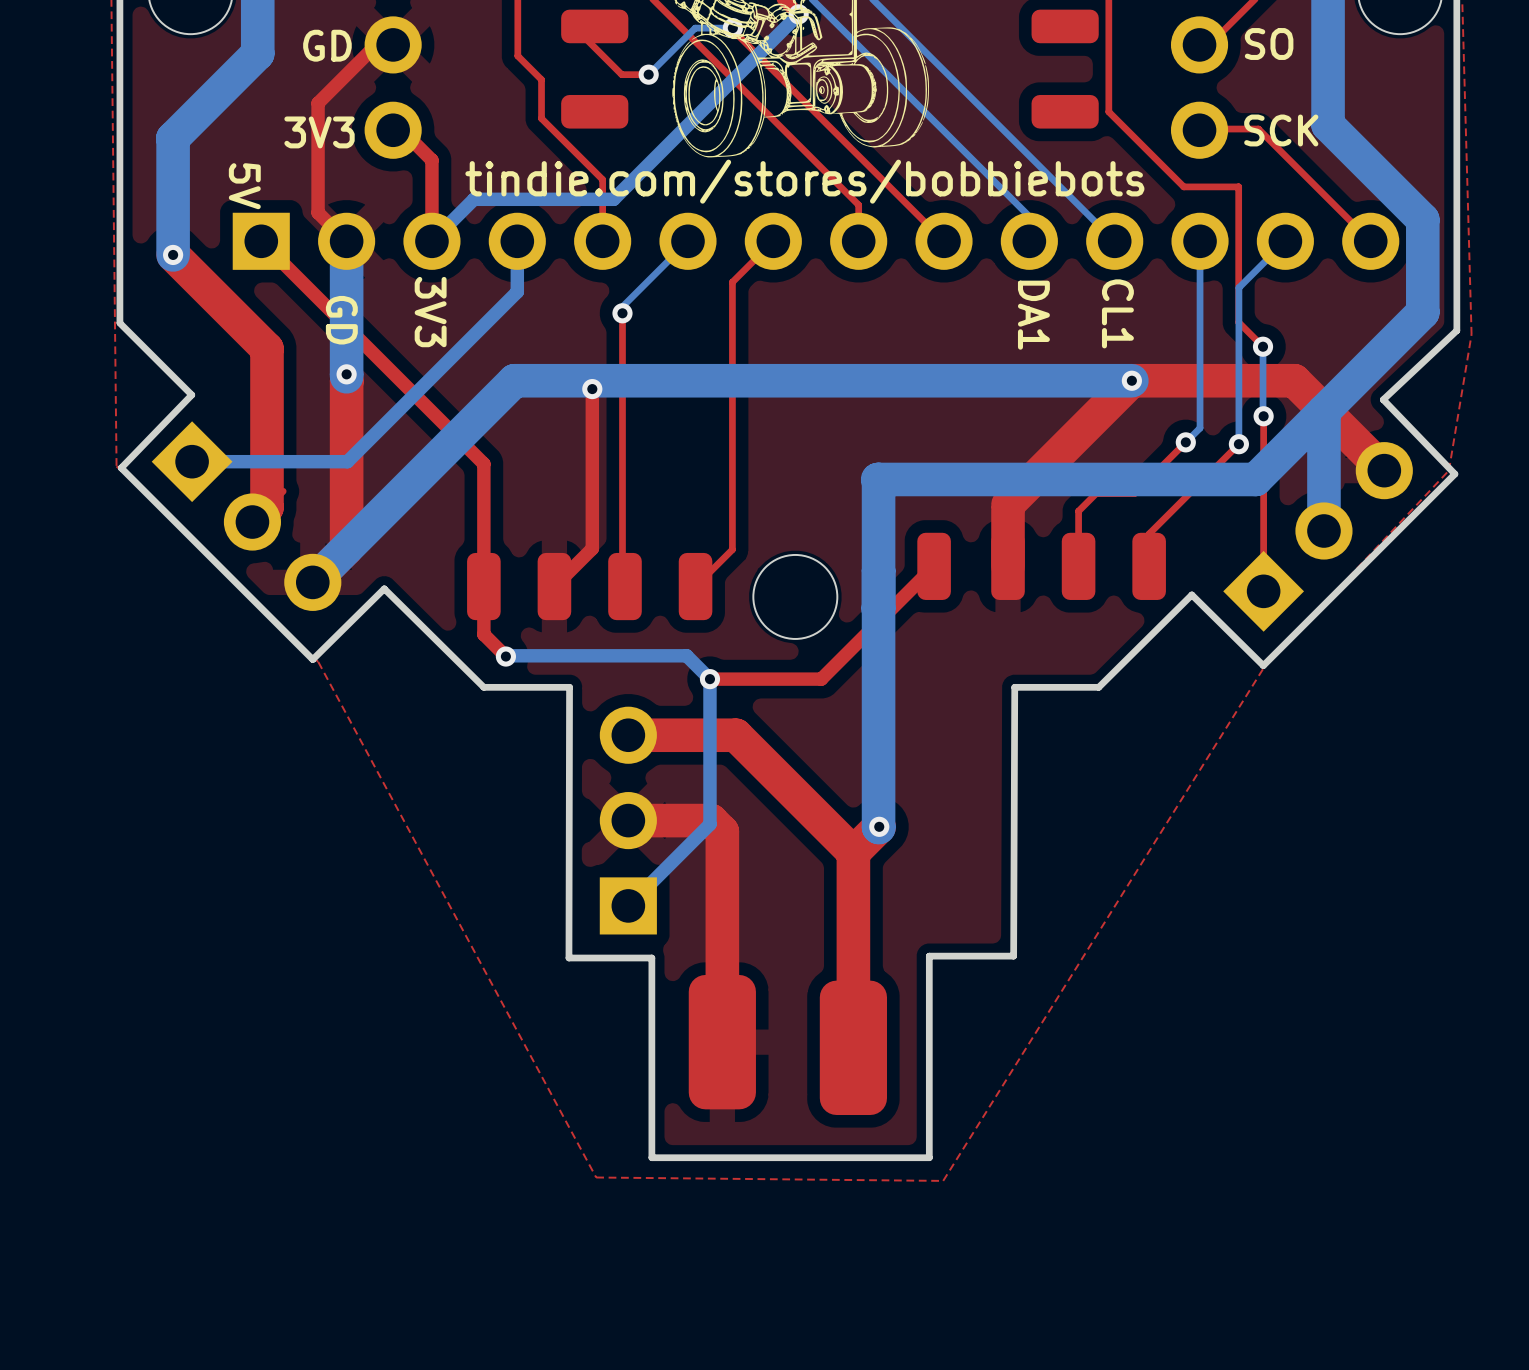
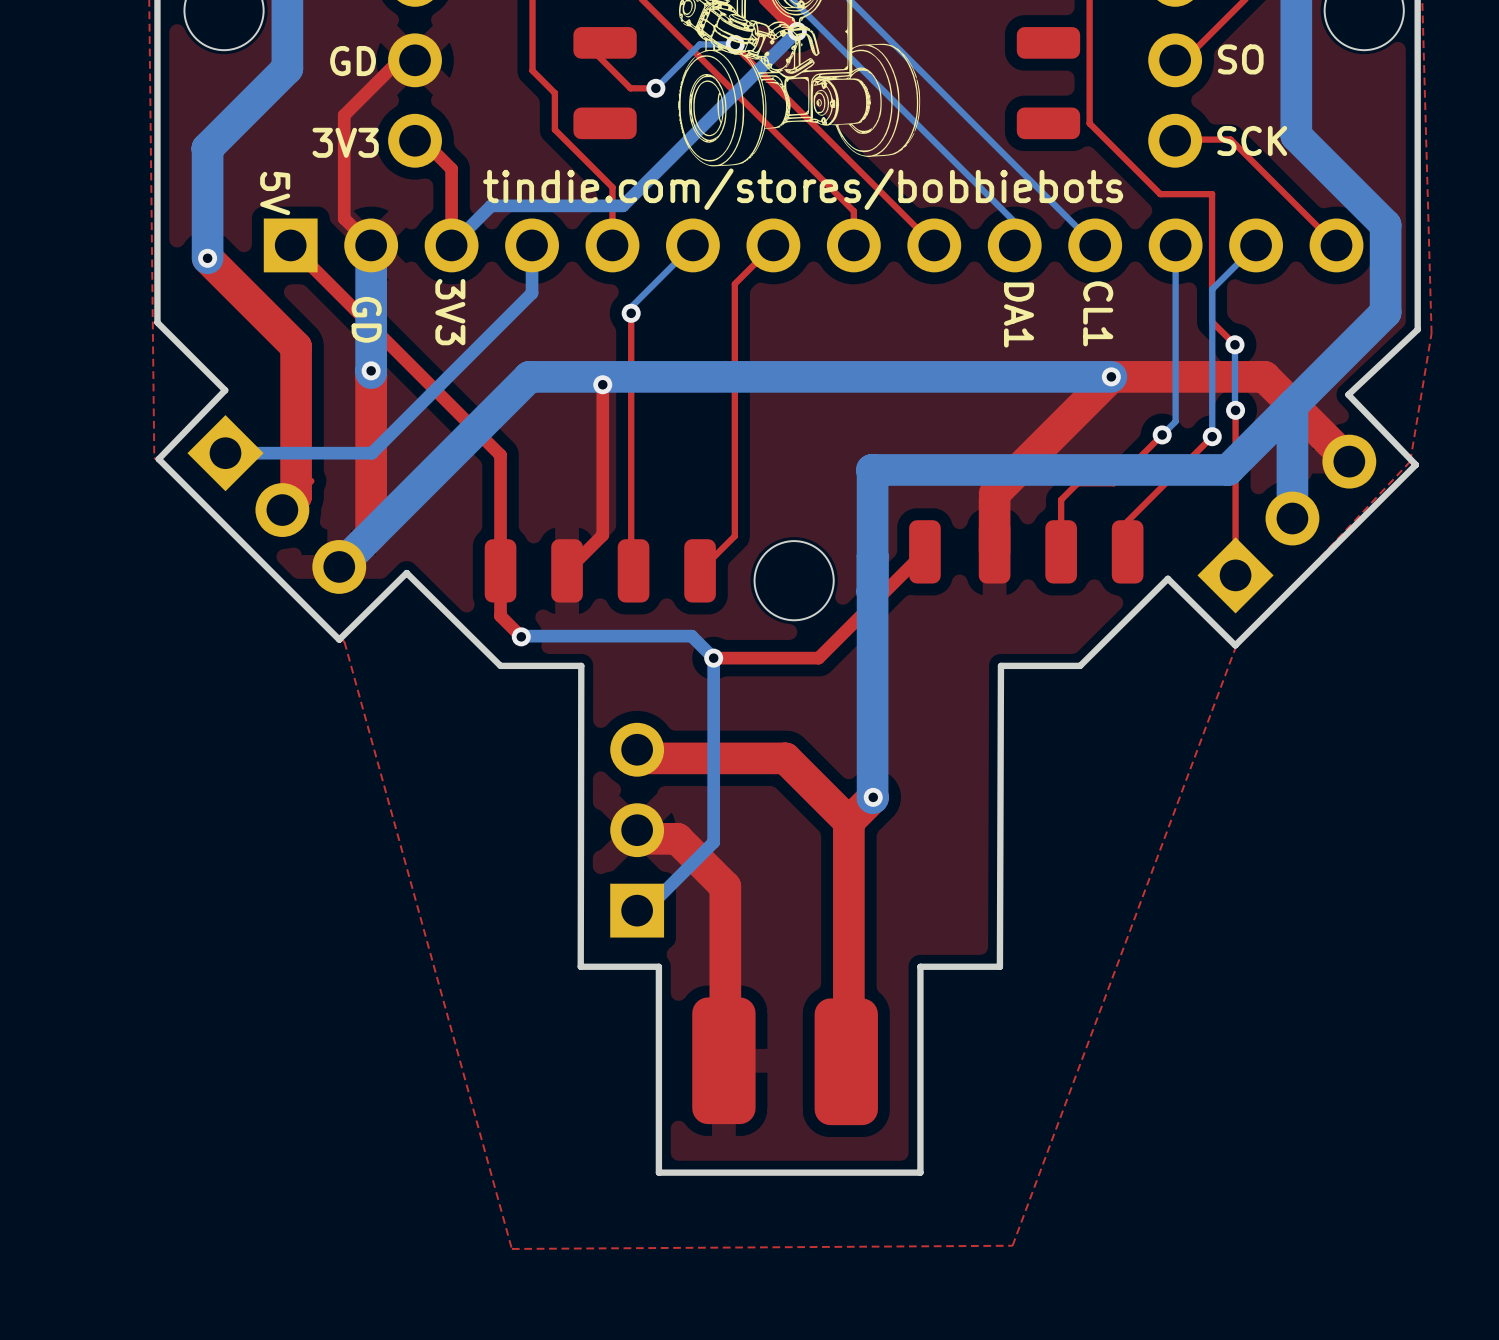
top zone outline: (318, 662) (596, 1177) (943, 1180) (1263, 668) -> (344, 642) (511, 1248) (1012, 1245) (1235, 647)
board edge: (569, 687) (568, 958) (651, 958) (651, 1006) -> (581, 665) (580, 966) (658, 966)
board edge: (1014, 687) (1013, 956) (929, 956) (929, 1006) -> (1000, 665) (999, 966) (920, 966)
top track: (628, 735) (735, 735) (786, 785) -> (636, 758) (785, 758)
top track: (628, 820) (711, 820) (722, 831) (722, 921) -> (636, 838) (677, 838) (725, 886)
part position: (628, 820) -> (637, 830)
bottom track: (709, 824) (628, 905) -> (713, 794) (713, 842) (636, 919)
part position: (722, 1042) -> (723, 1060)
part position: (853, 1047) -> (846, 1061)
board edge: (929, 1157) (651, 1157) -> (920, 1109) (920, 1172) (658, 1172) (658, 1109)

